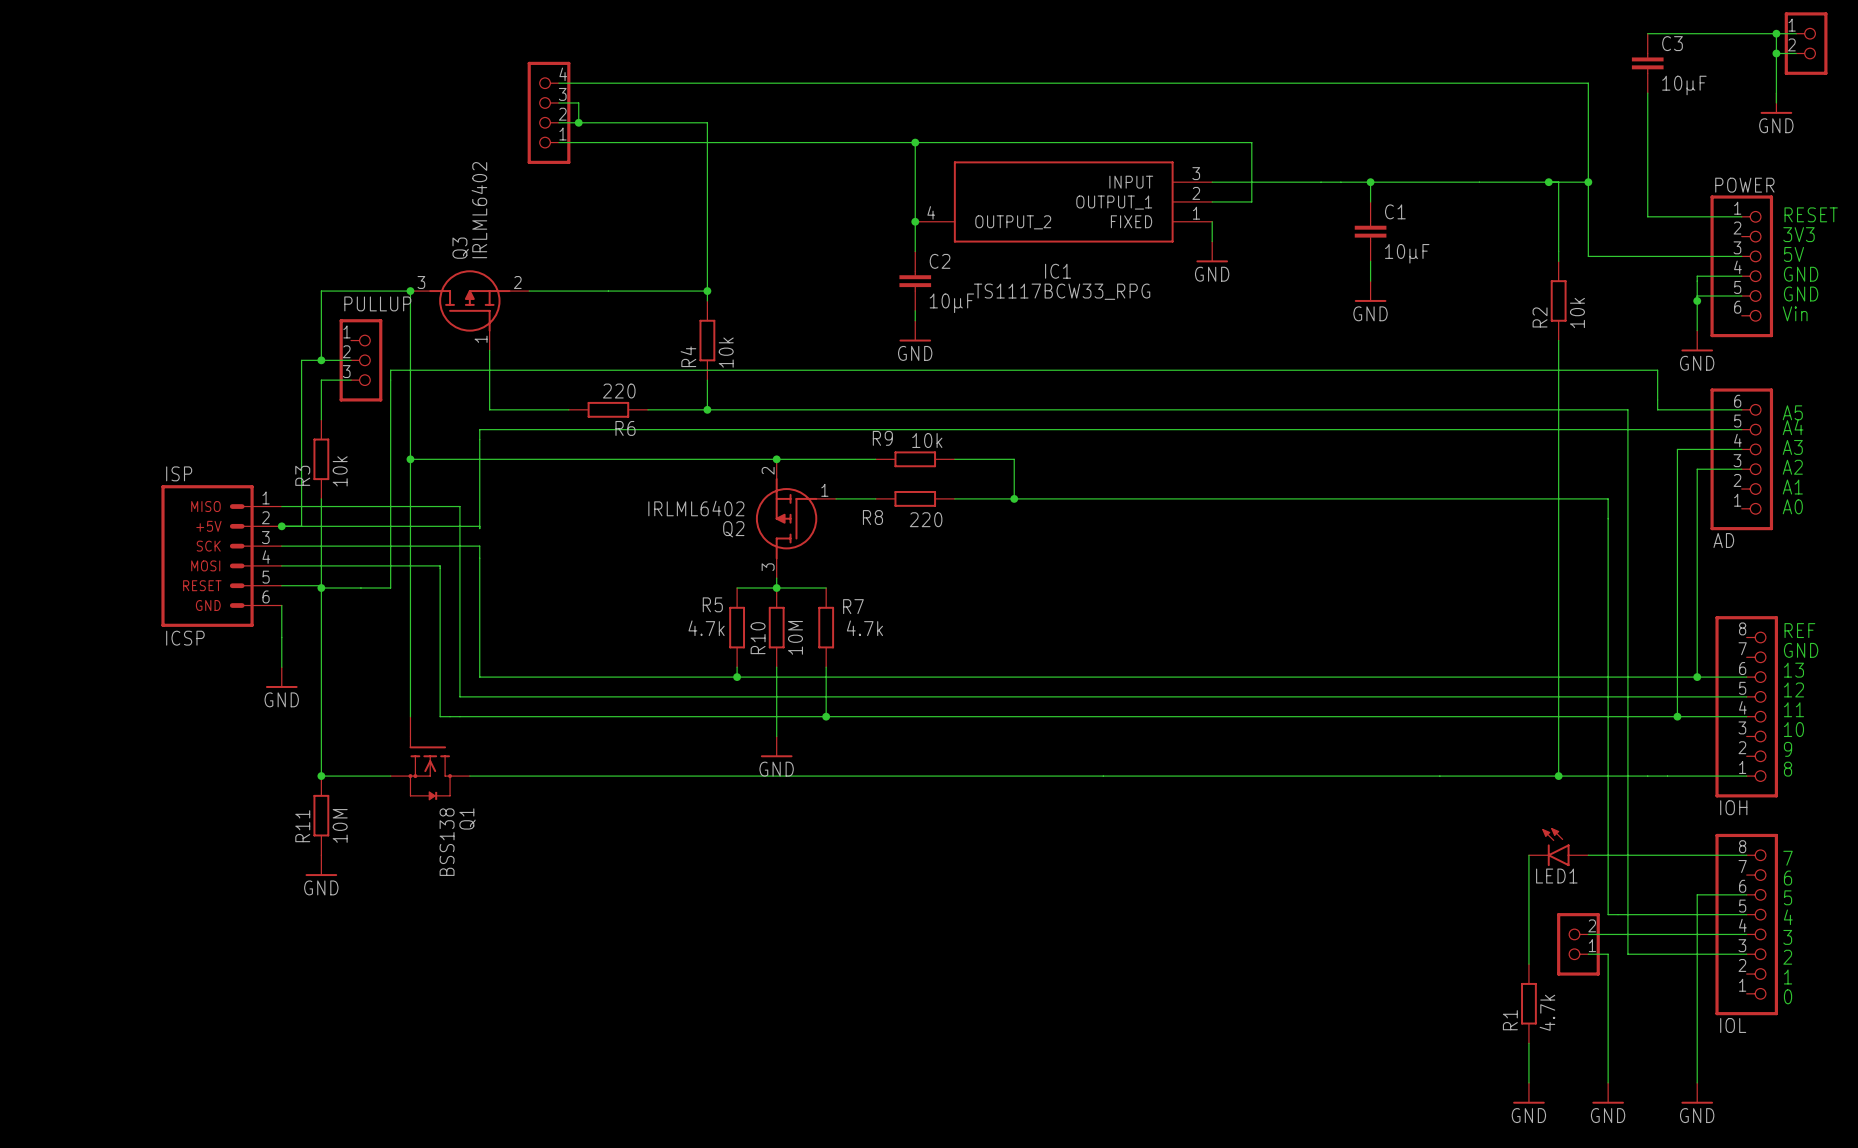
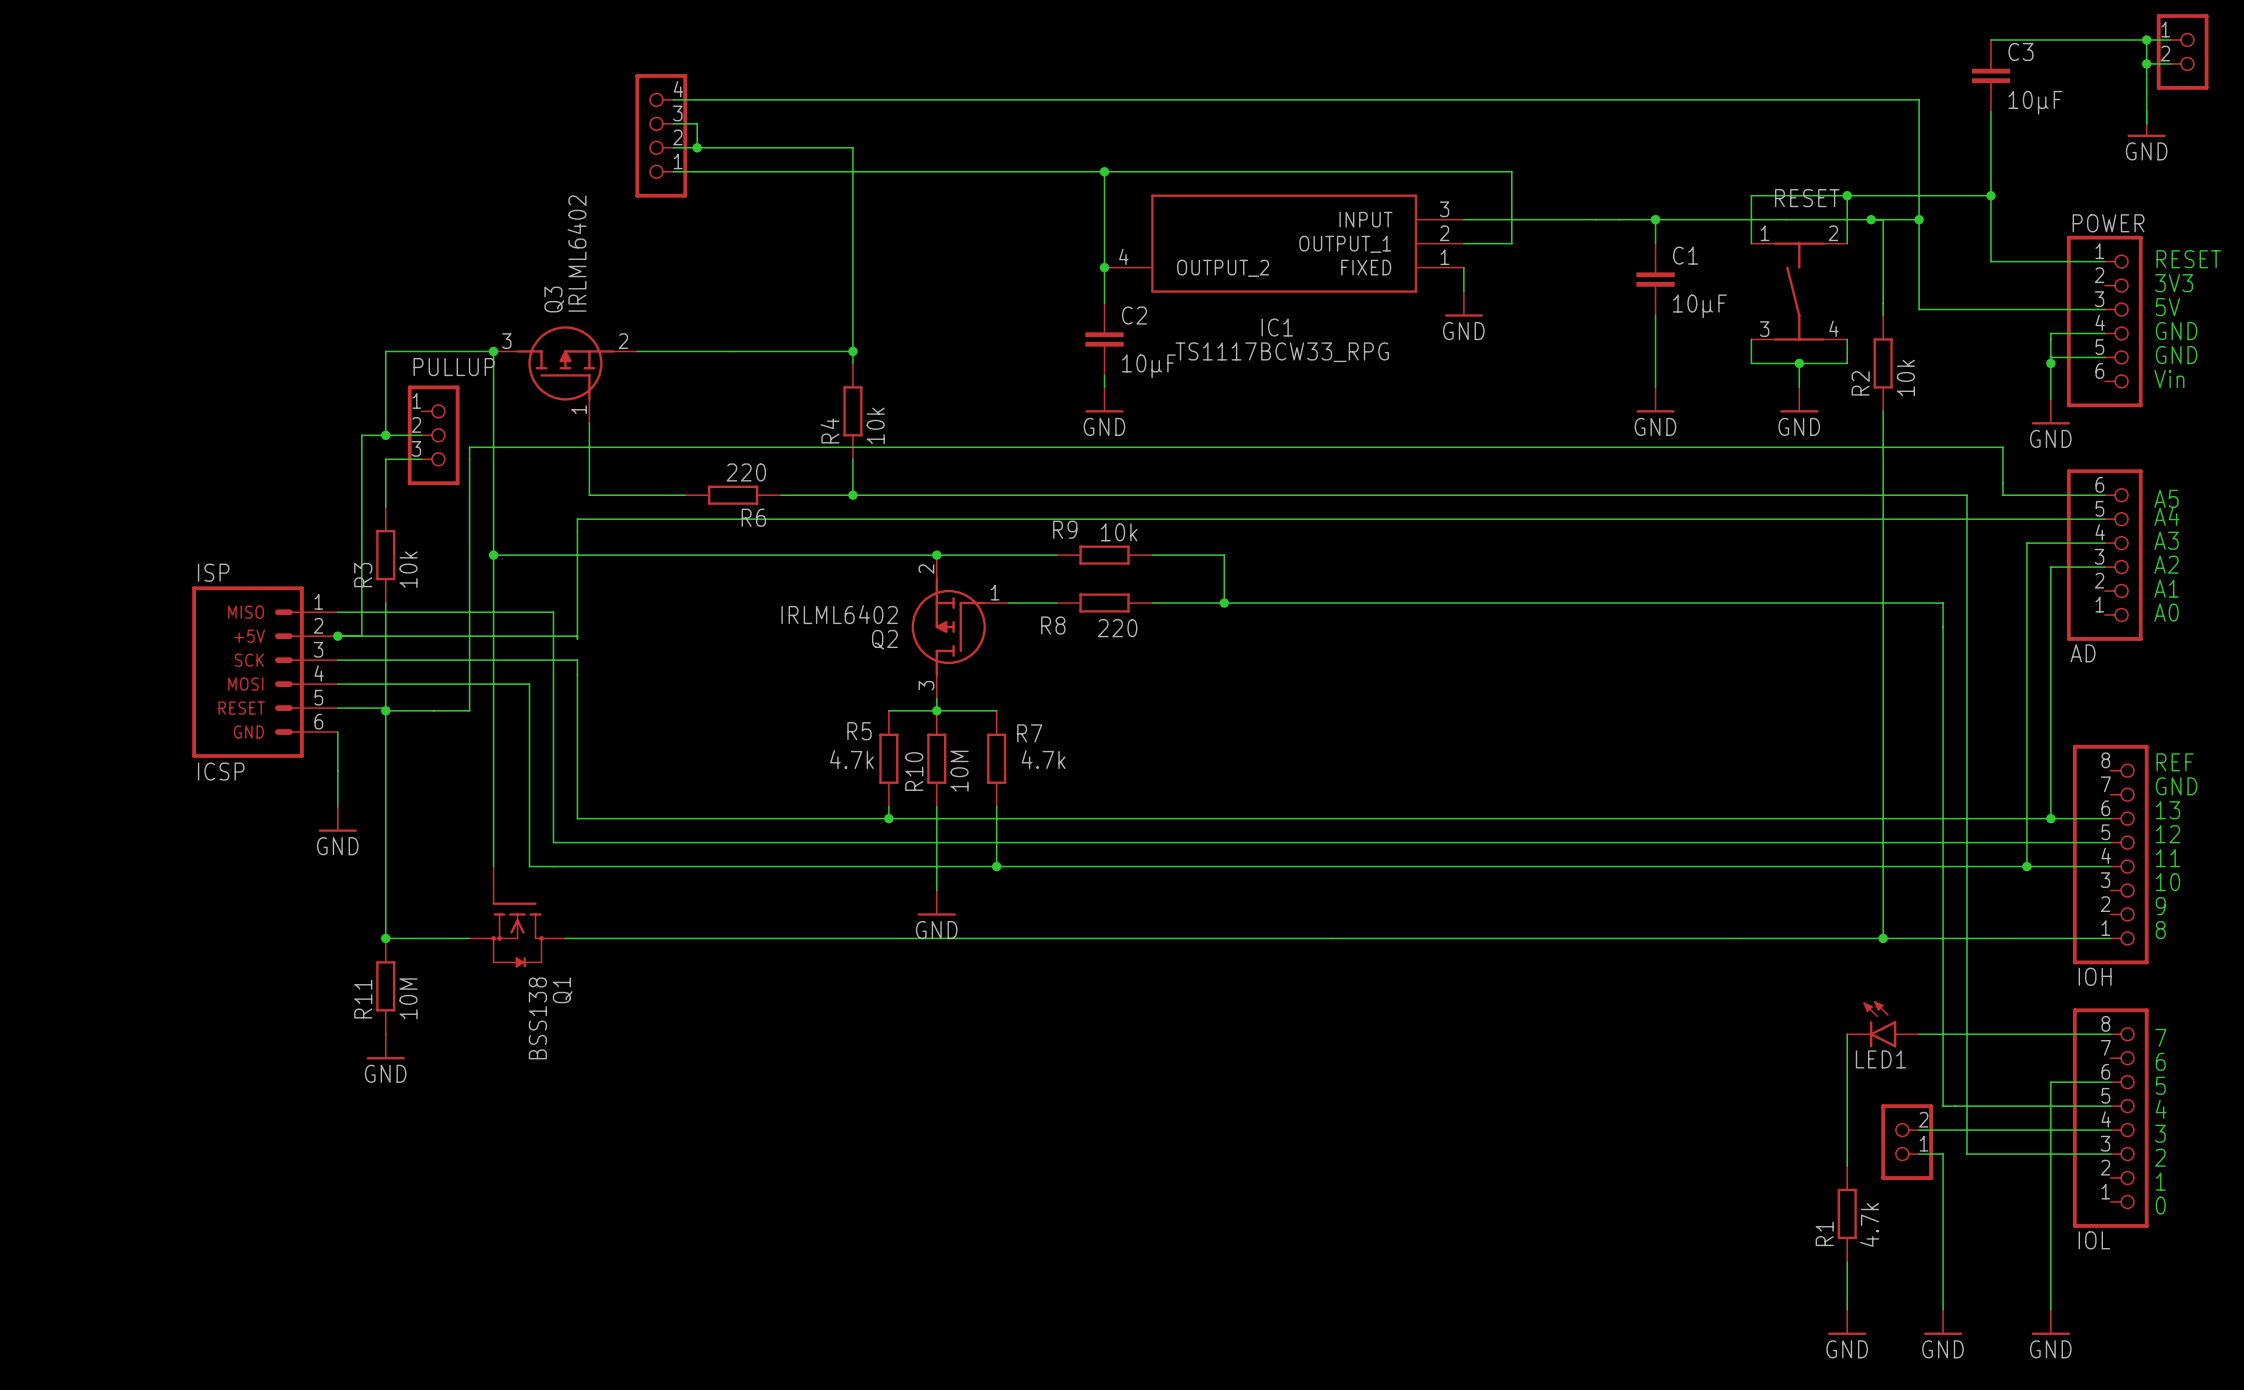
wire: none -> (1847, 195) (1847, 243)
junction: none -> (1847, 195)
wire: none -> (1990, 195) (1751, 195) (1751, 243)
junction: none -> (1990, 195)
RESET: none -> (1799, 291)
wire: none -> (1751, 339) (1751, 363) (1847, 363) (1847, 339)
power symbol position: GND (1370, 291) -> GND (1655, 399)
wire: none -> (1799, 363) (1799, 387)
junction: none -> (1799, 363)
power symbol: none -> GND (1799, 399)

